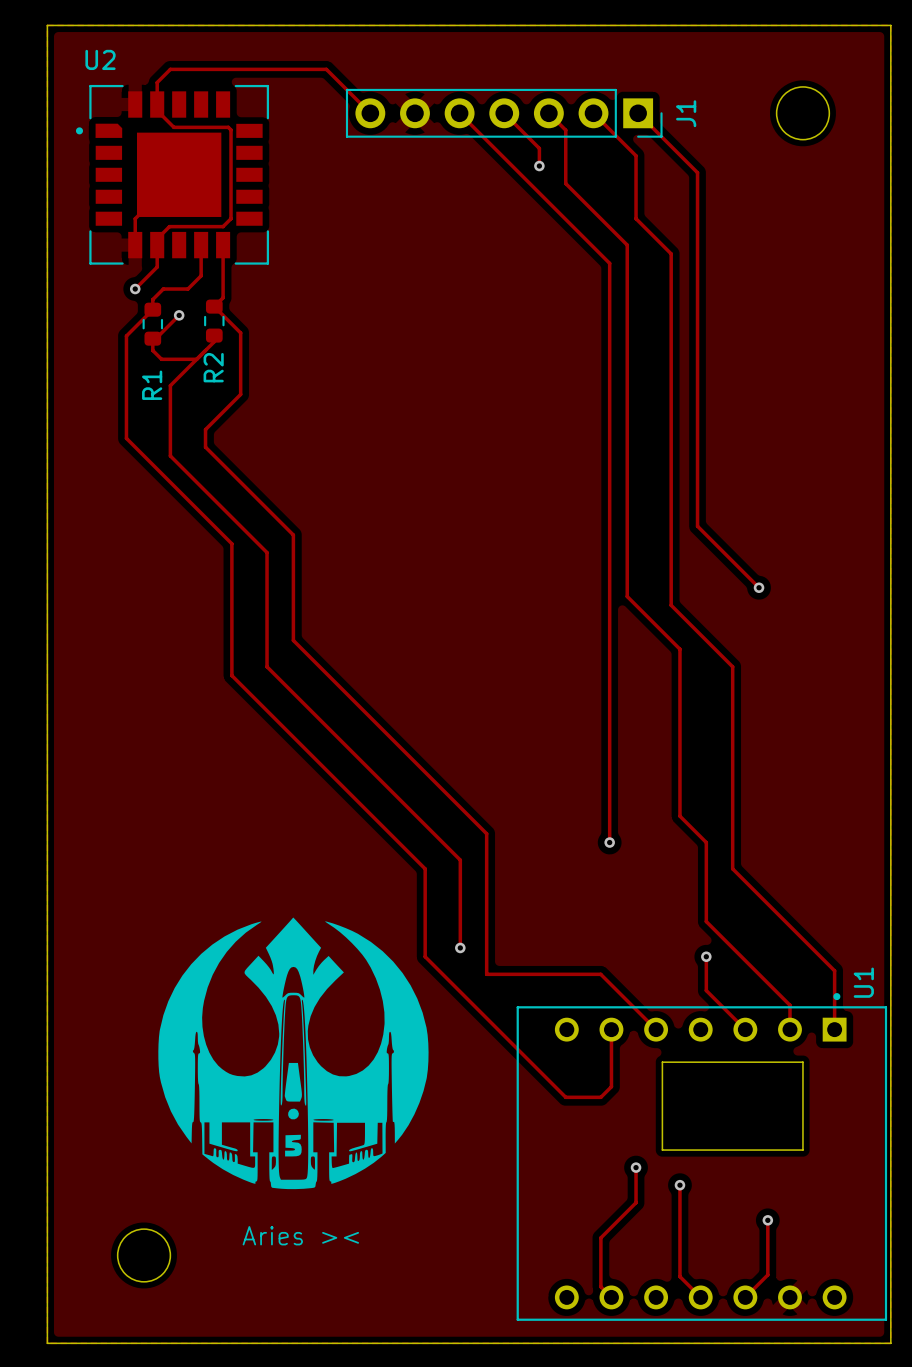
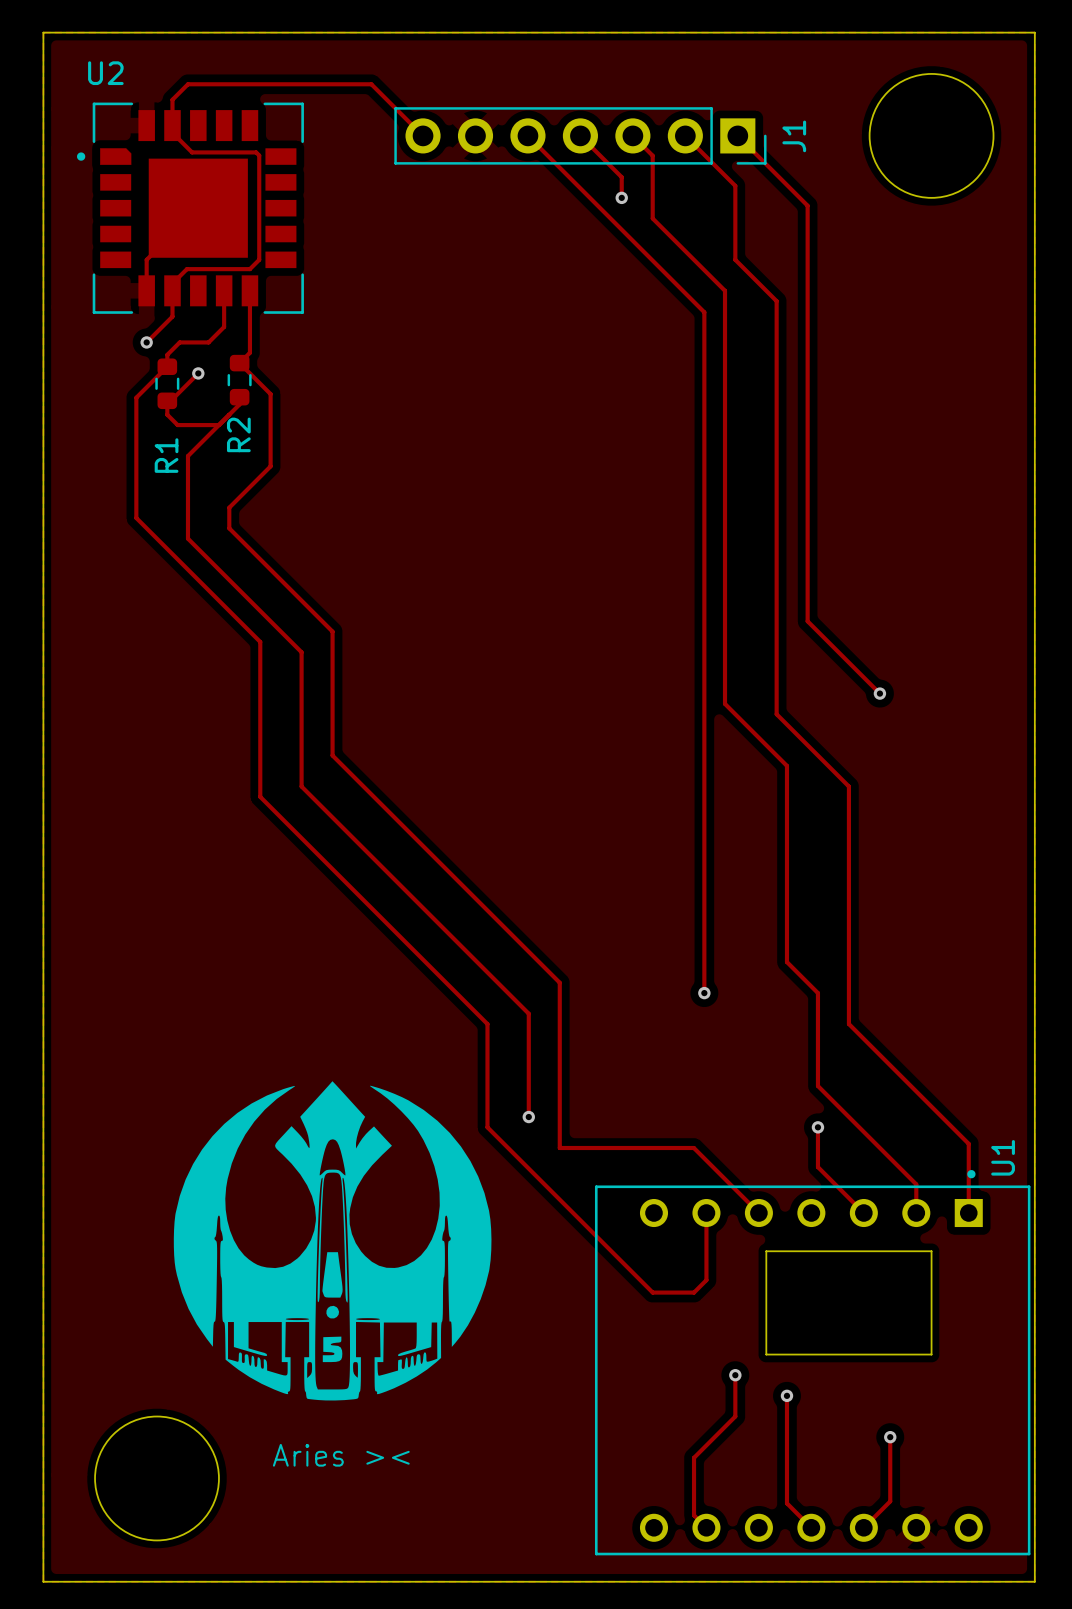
round board edge size: [776, 86, 830, 141] -> [869, 73, 995, 199]
round board edge size: [117, 1228, 171, 1283] -> [94, 1415, 220, 1541]

